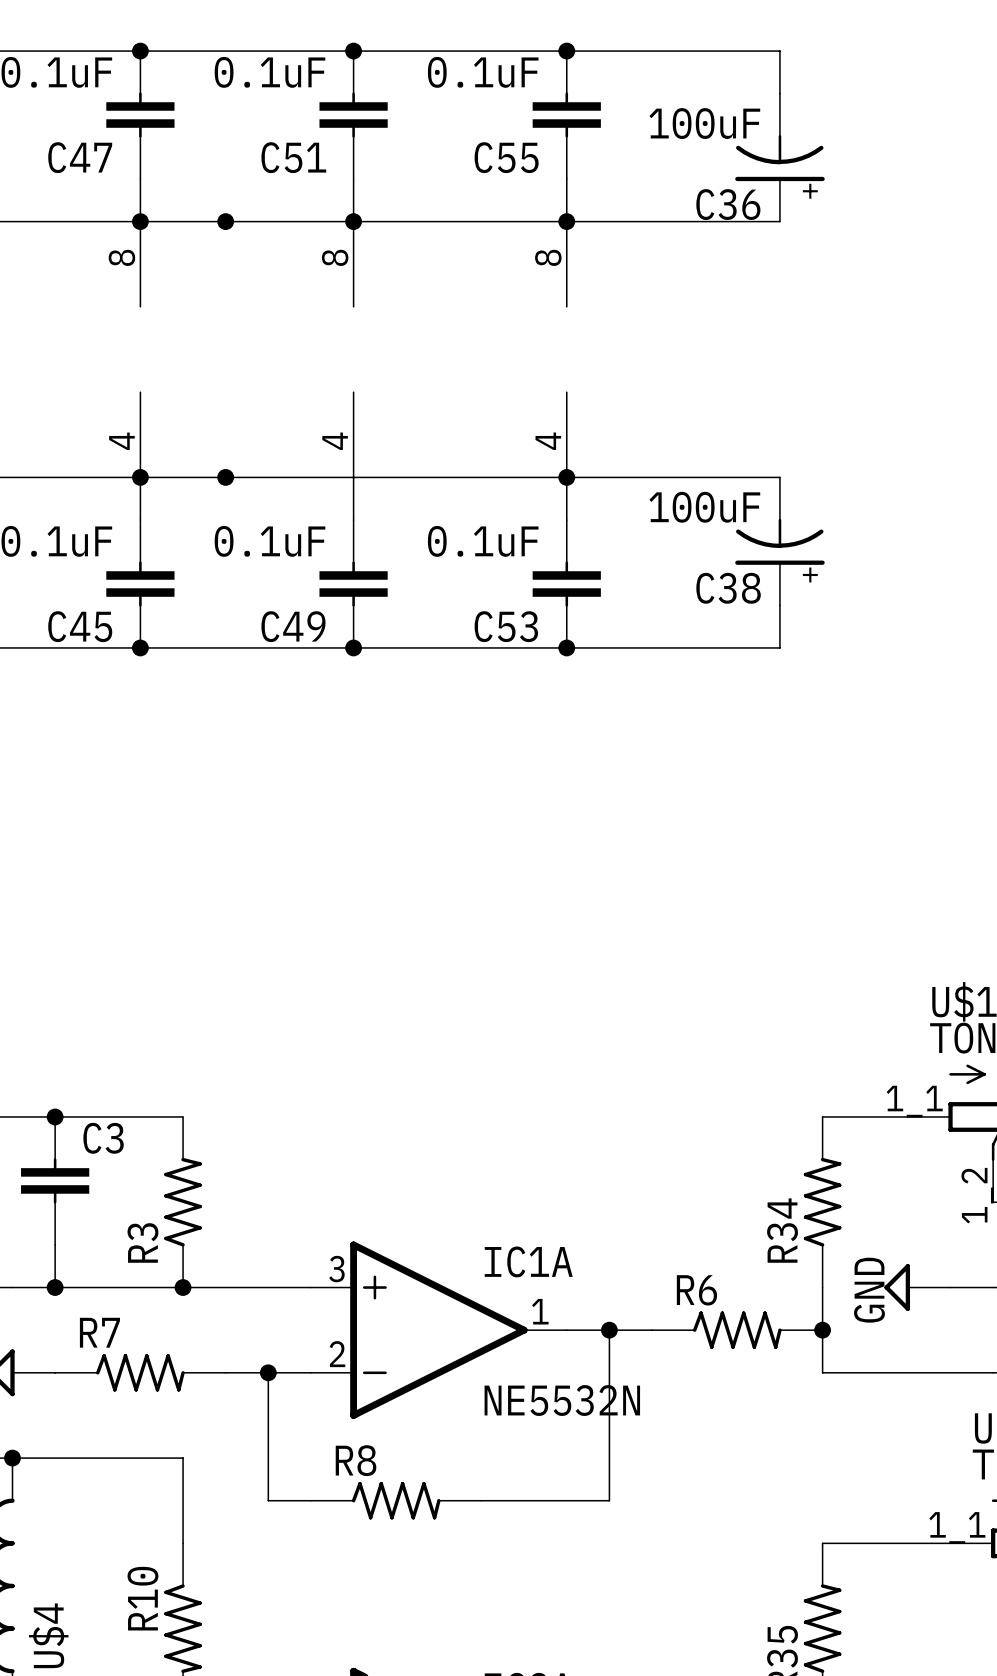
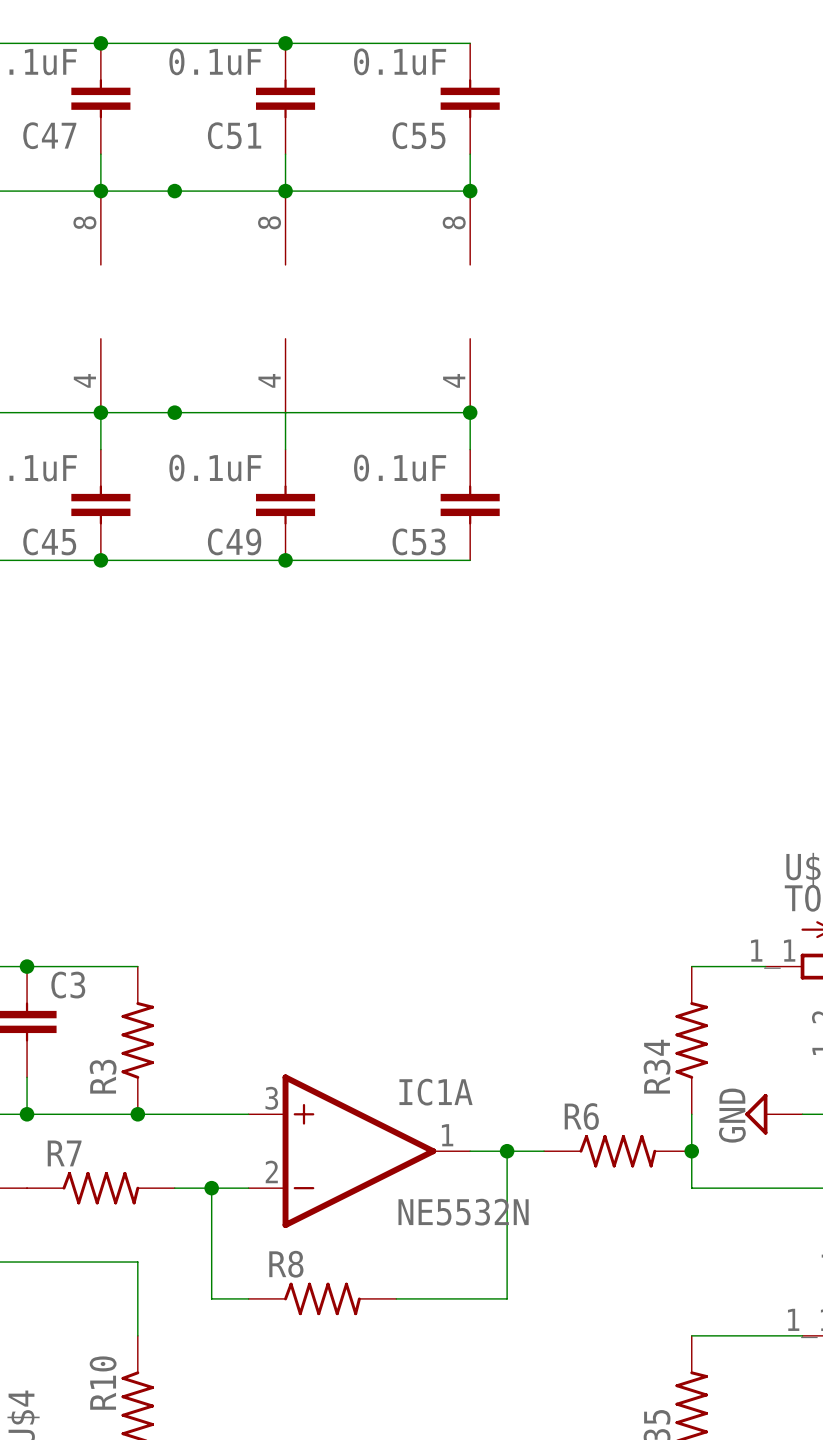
wire: (566, 51) (779, 51) (779, 93) -> none
junction: (566, 51) -> none
C36: 100uF (779, 157) -> none
wire: (566, 221) (779, 221) -> none
wire: (566, 477) (779, 477) -> none
C38: 100uF (779, 541) -> none
wire: (779, 605) (779, 647) (566, 647) -> none
junction: (566, 647) -> none

